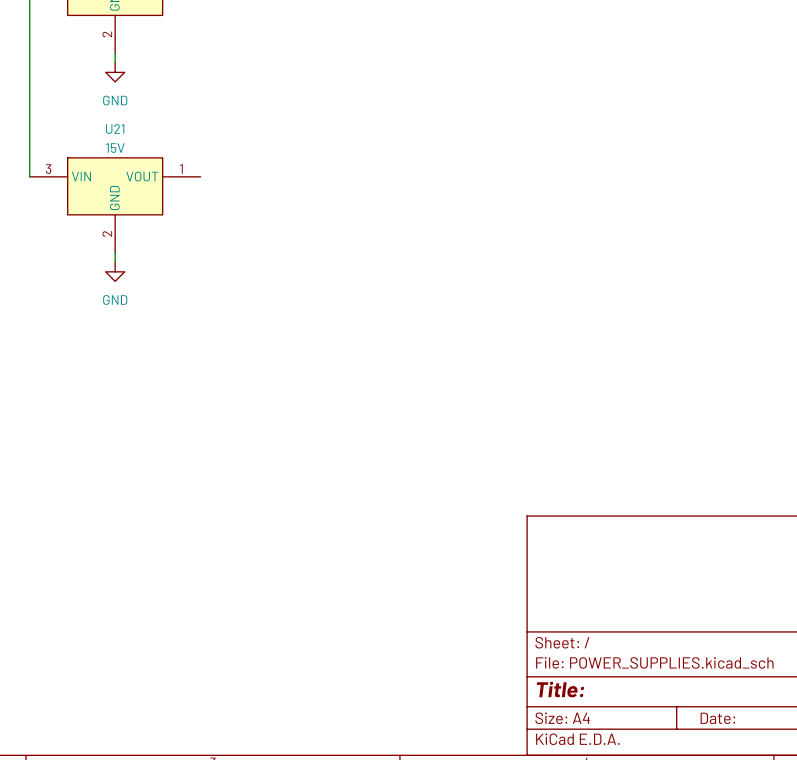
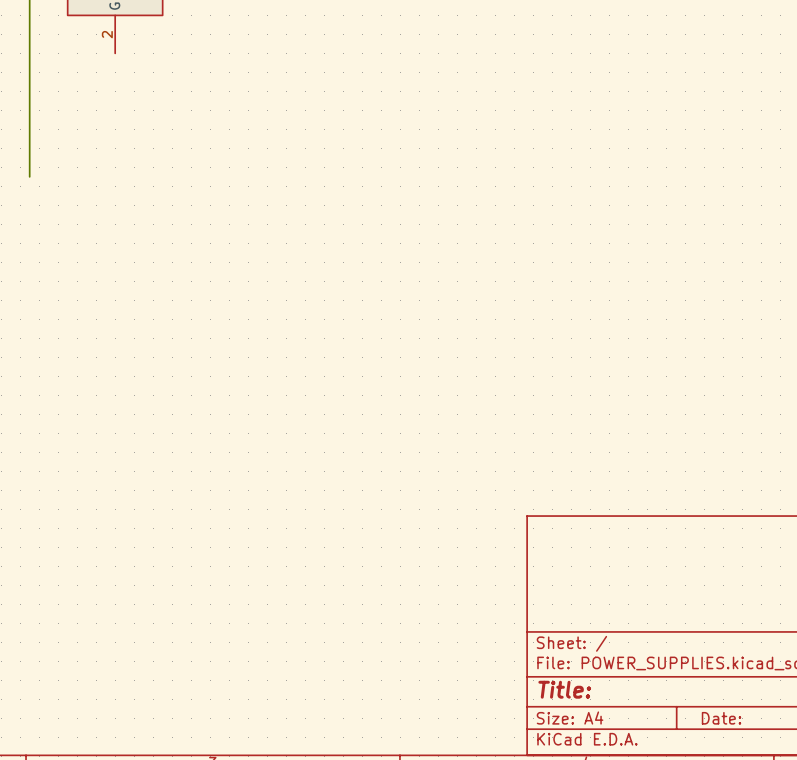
wire: (115, 53) (115, 62) -> none
power symbol: GND (115, 72) -> none
U21: 15V (115, 205) -> none
wire: (115, 252) (115, 262) -> none
power symbol: GND (115, 271) -> none

